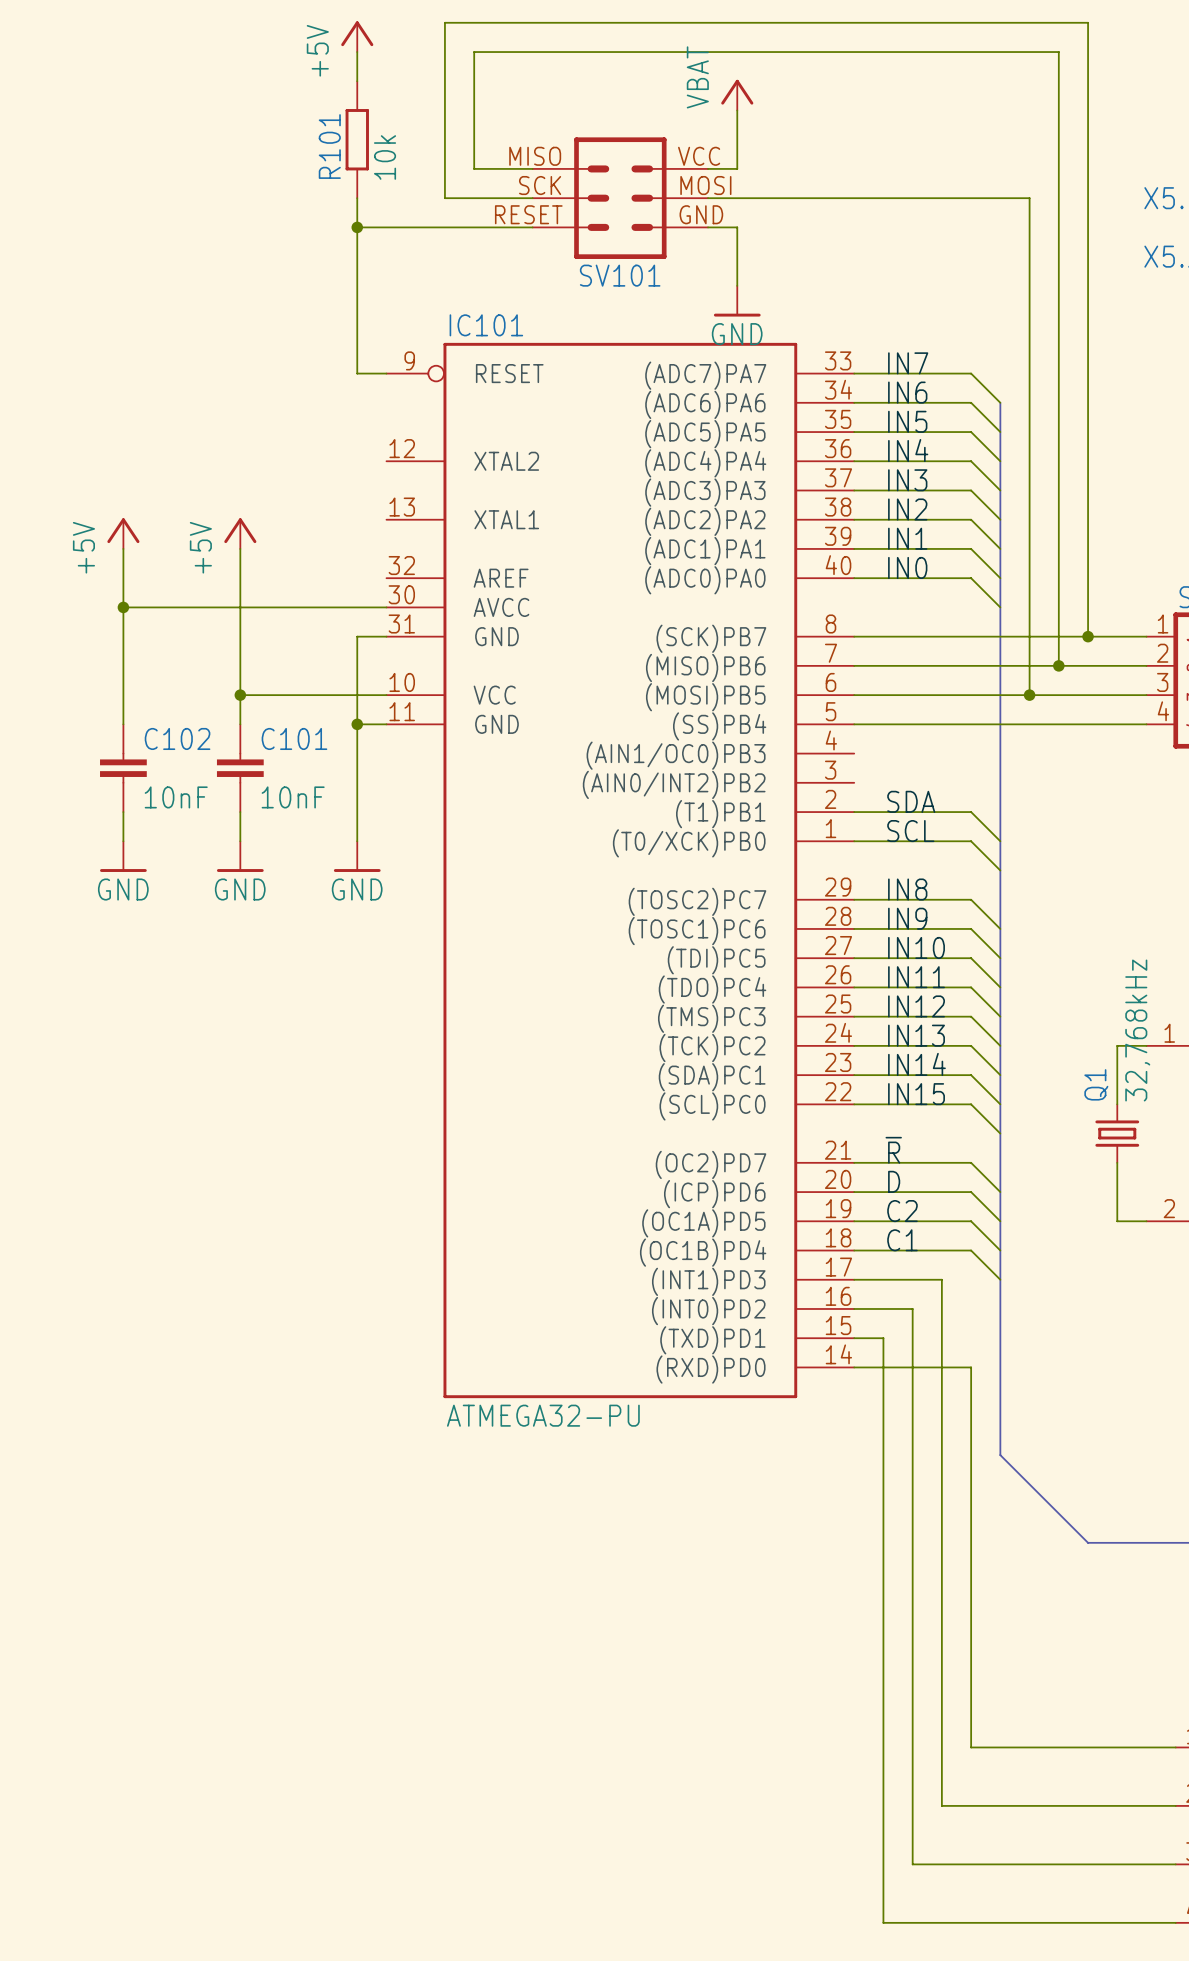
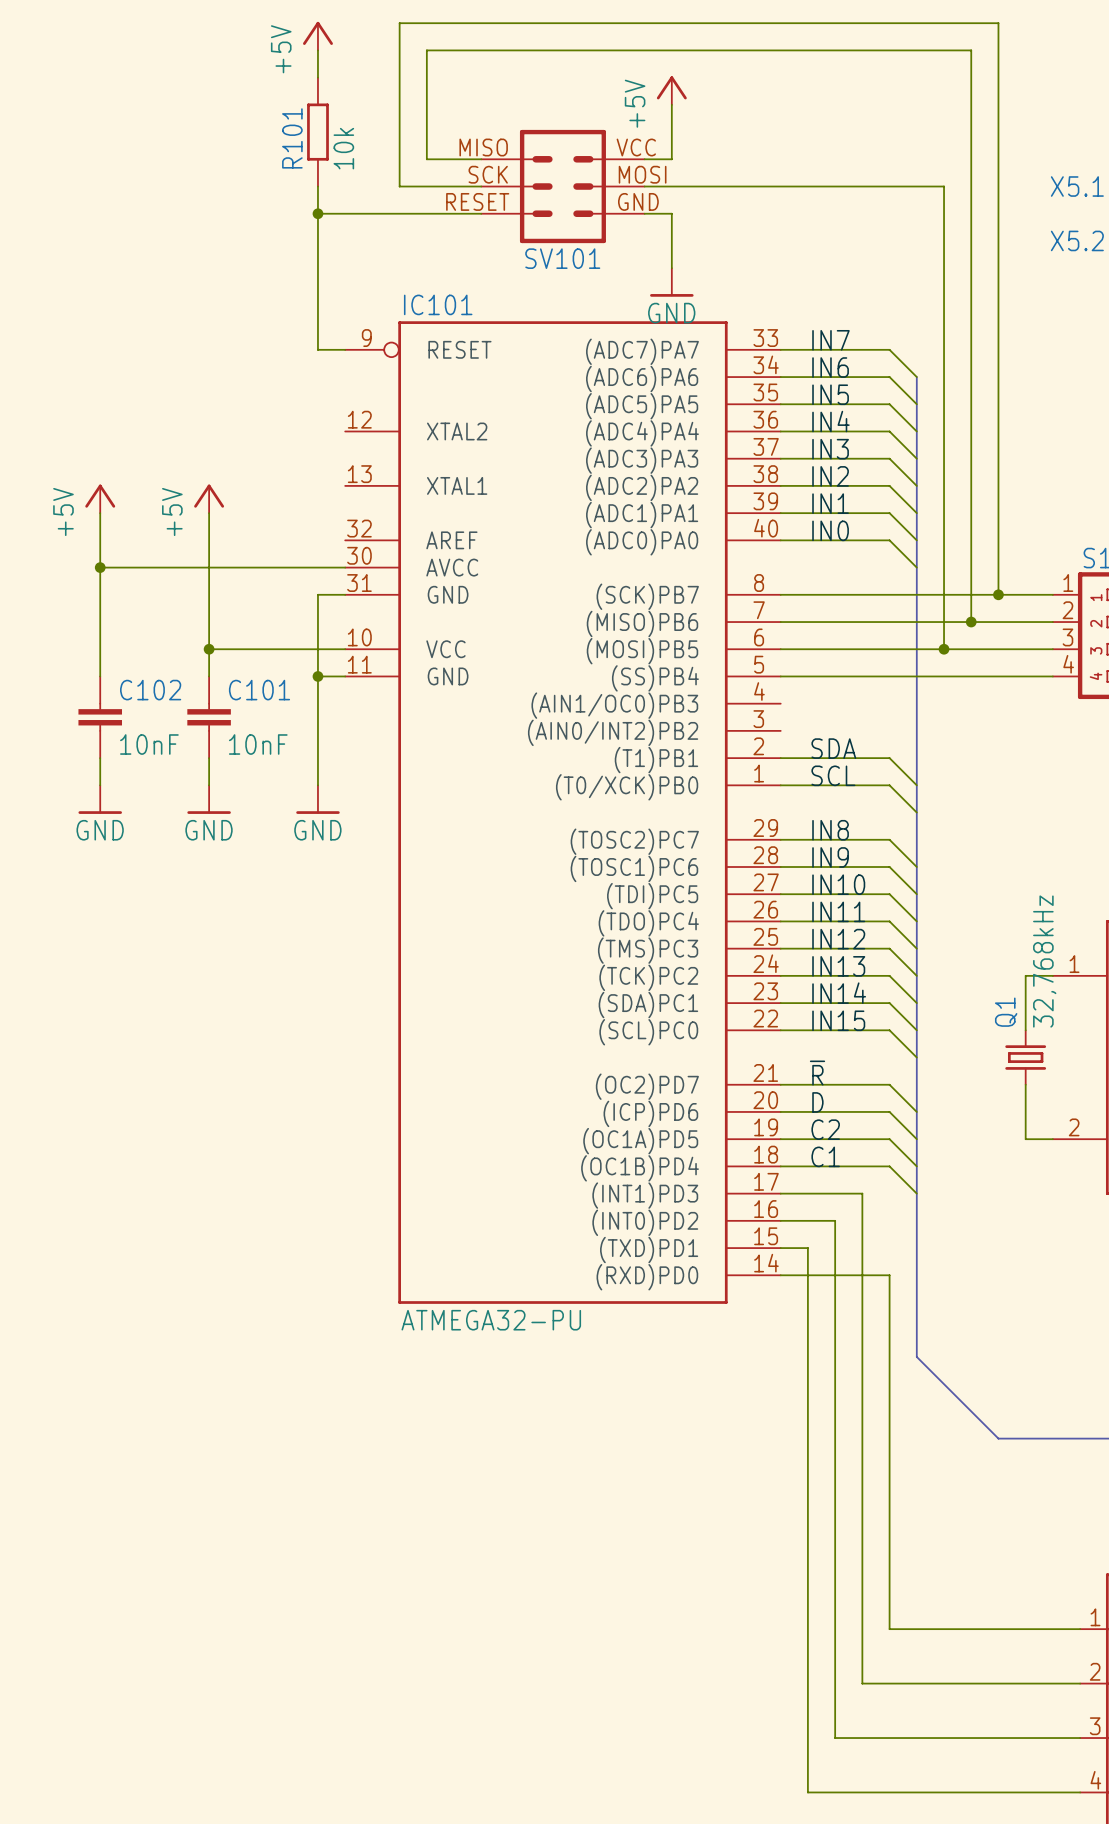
power symbol: VBAT (737, 95) -> +5V (671, 90)

